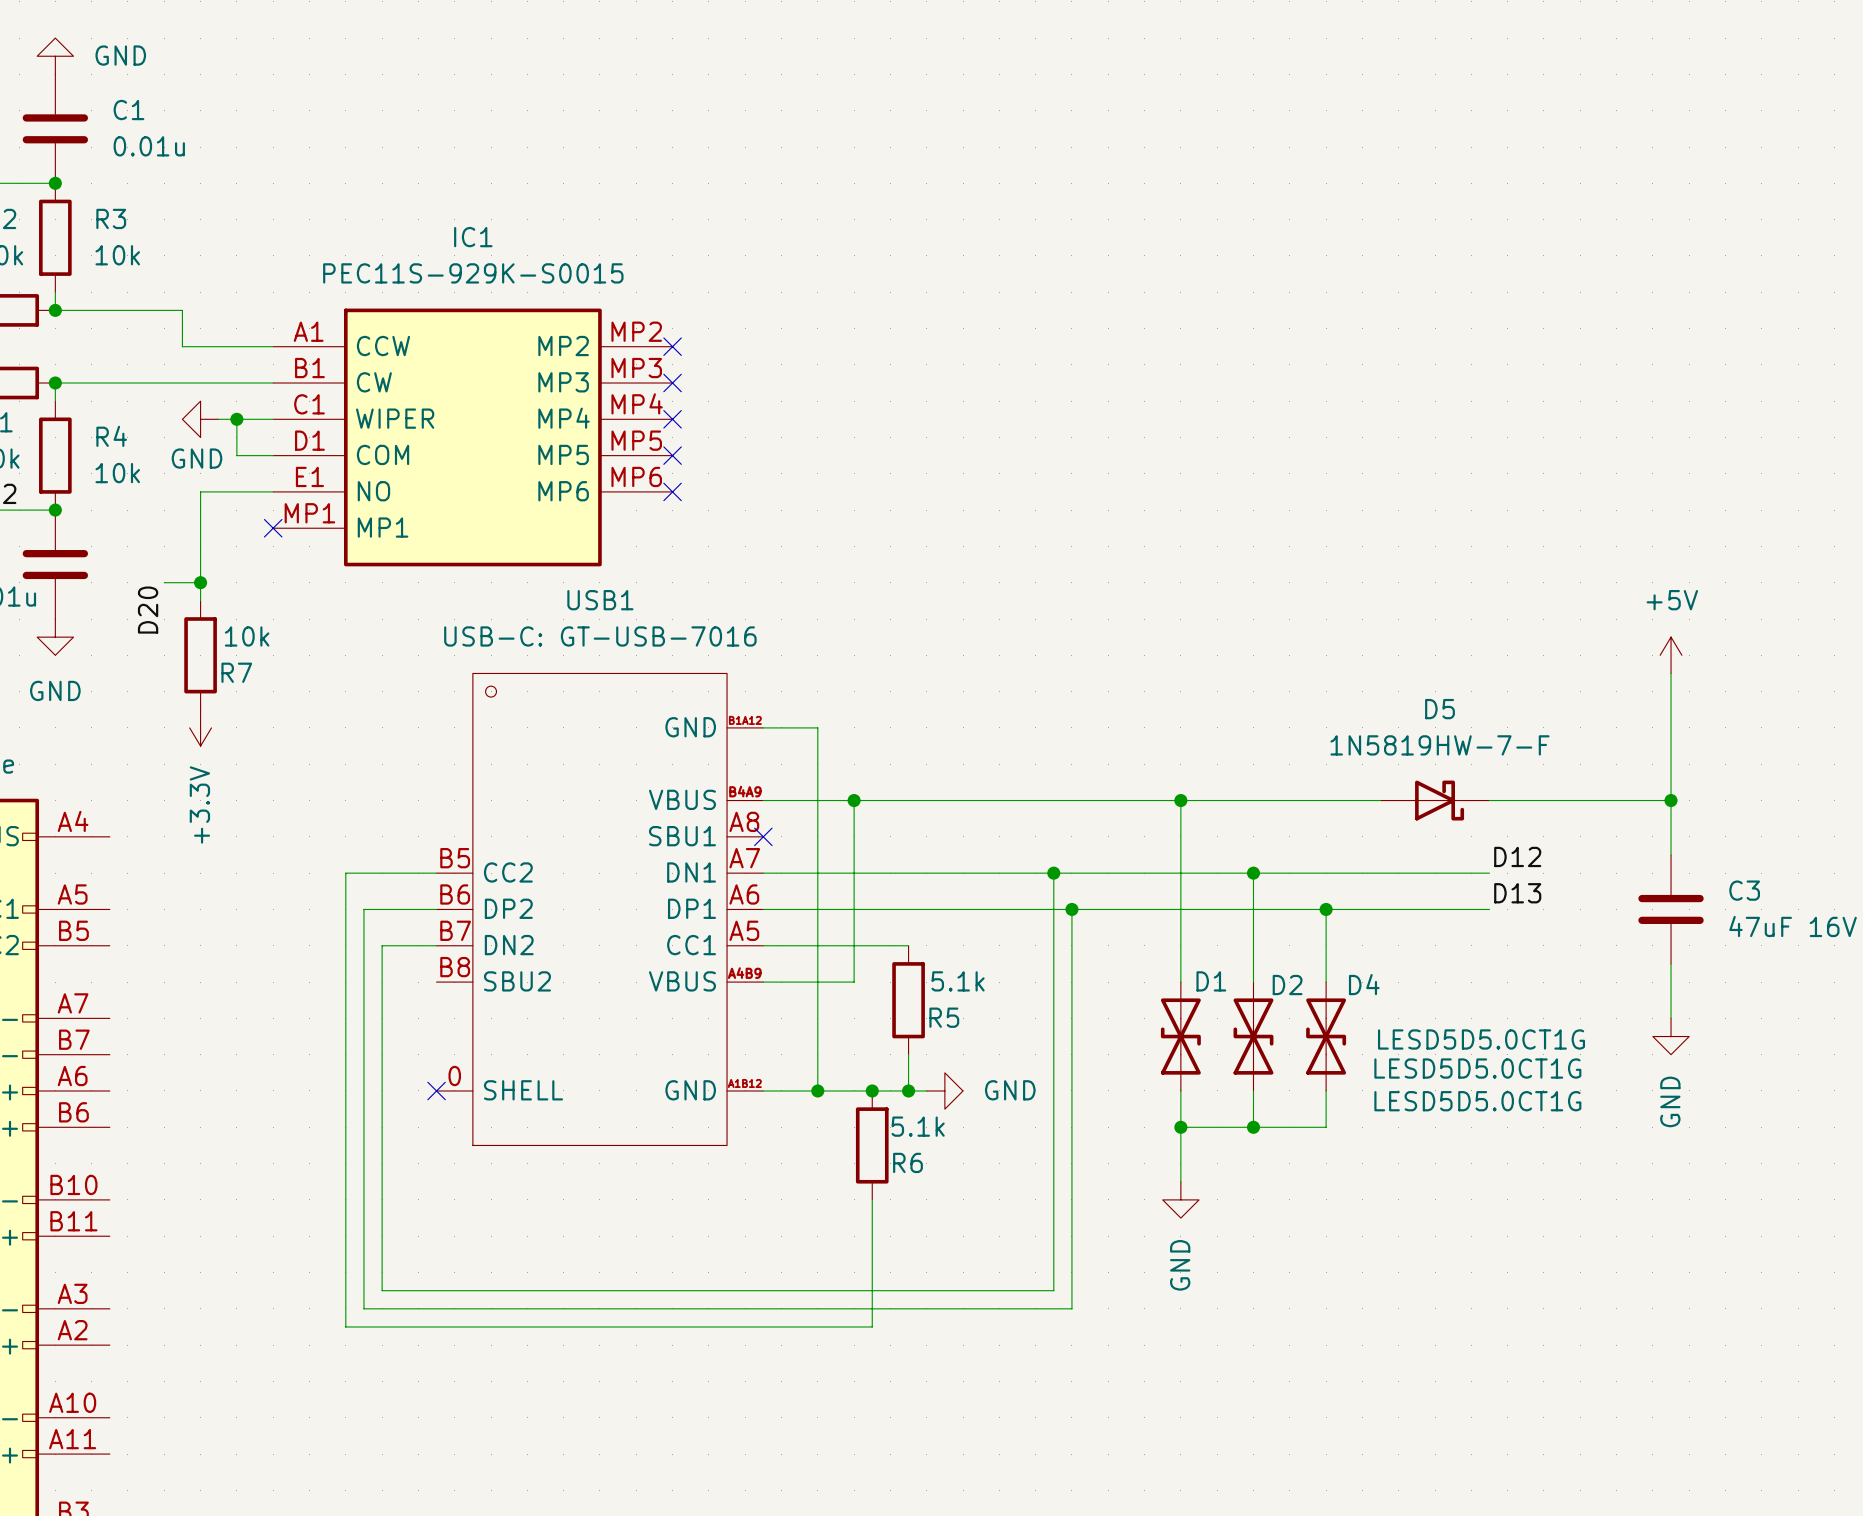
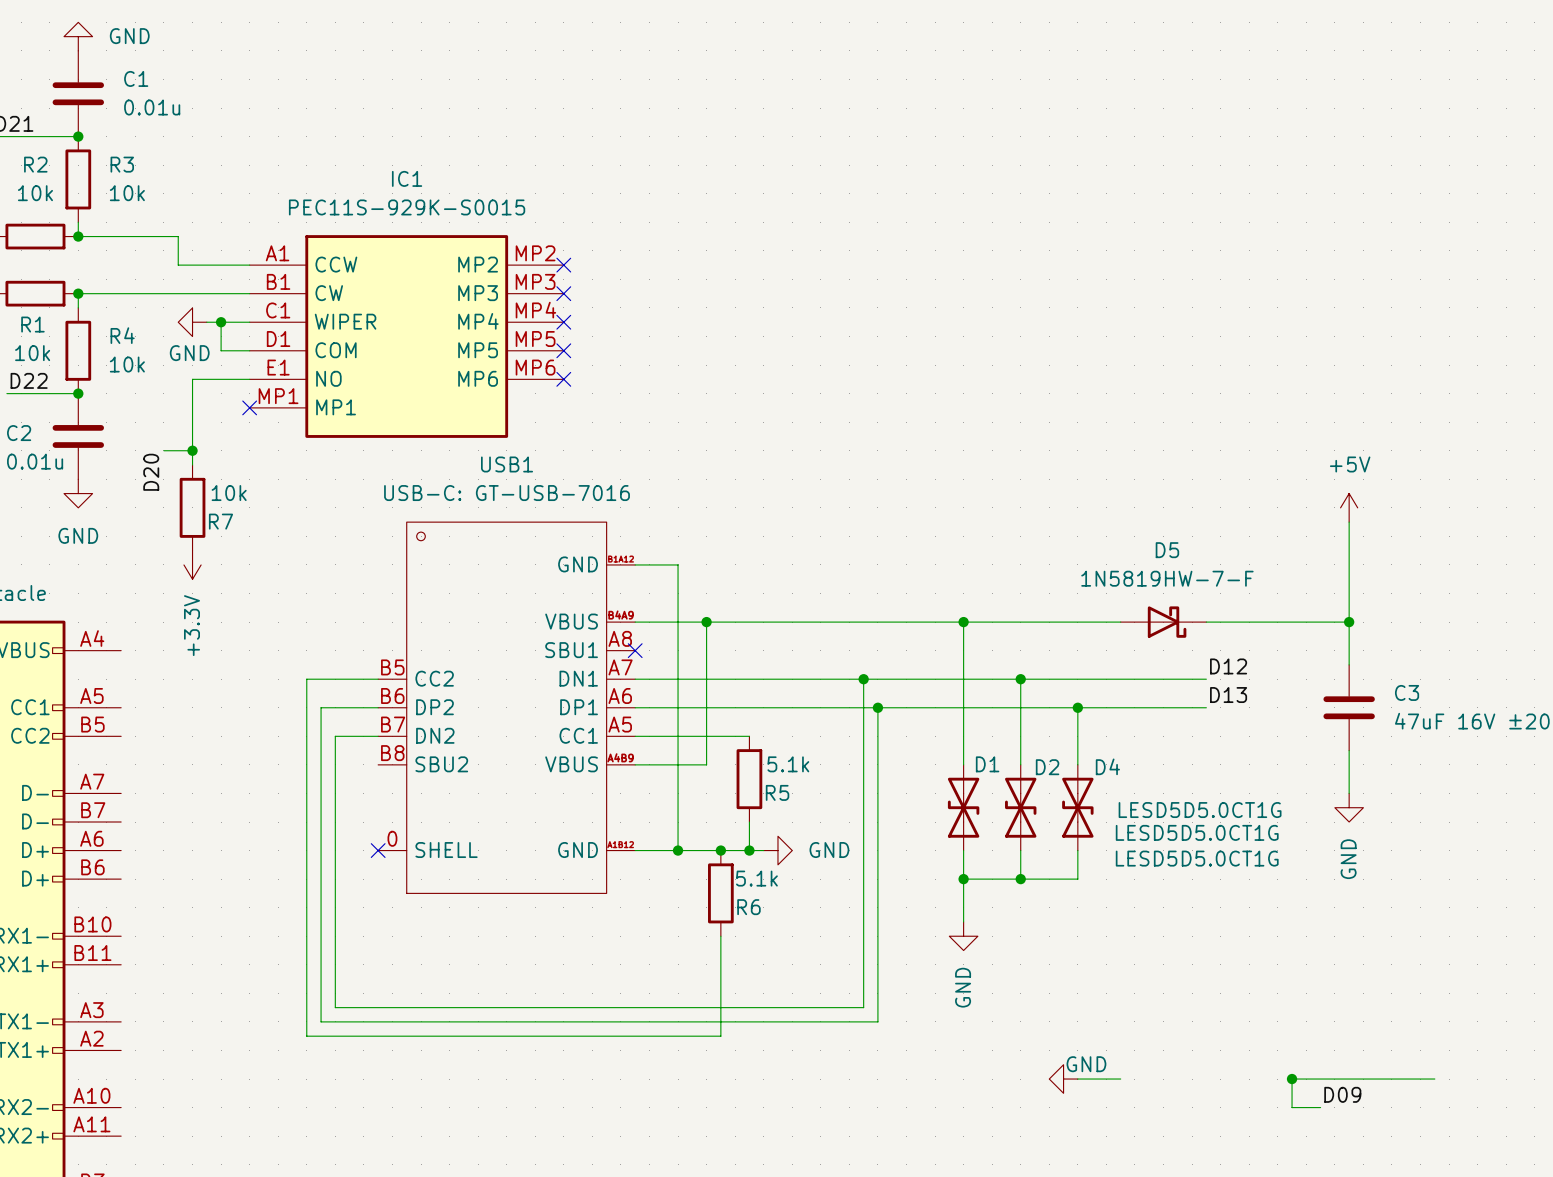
power symbol: none -> GND (1063, 1079)
wire: none -> (1077, 1079) (1120, 1079)
junction: none -> (1292, 1079)
wire: none -> (1434, 1079) (1292, 1079) (1292, 1107) (1320, 1107)
label: none -> D09 (1342, 1094)

